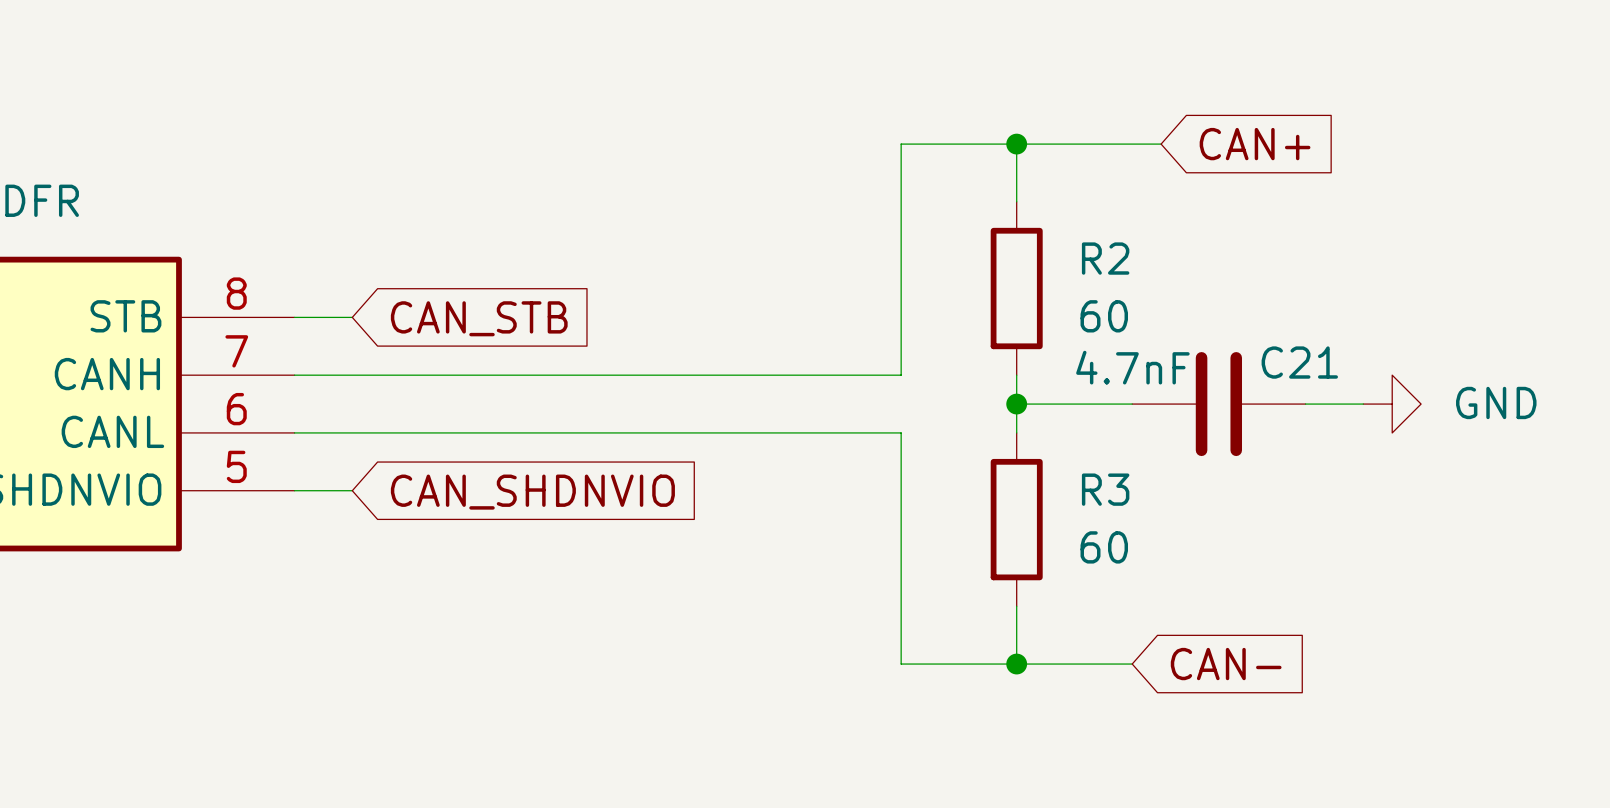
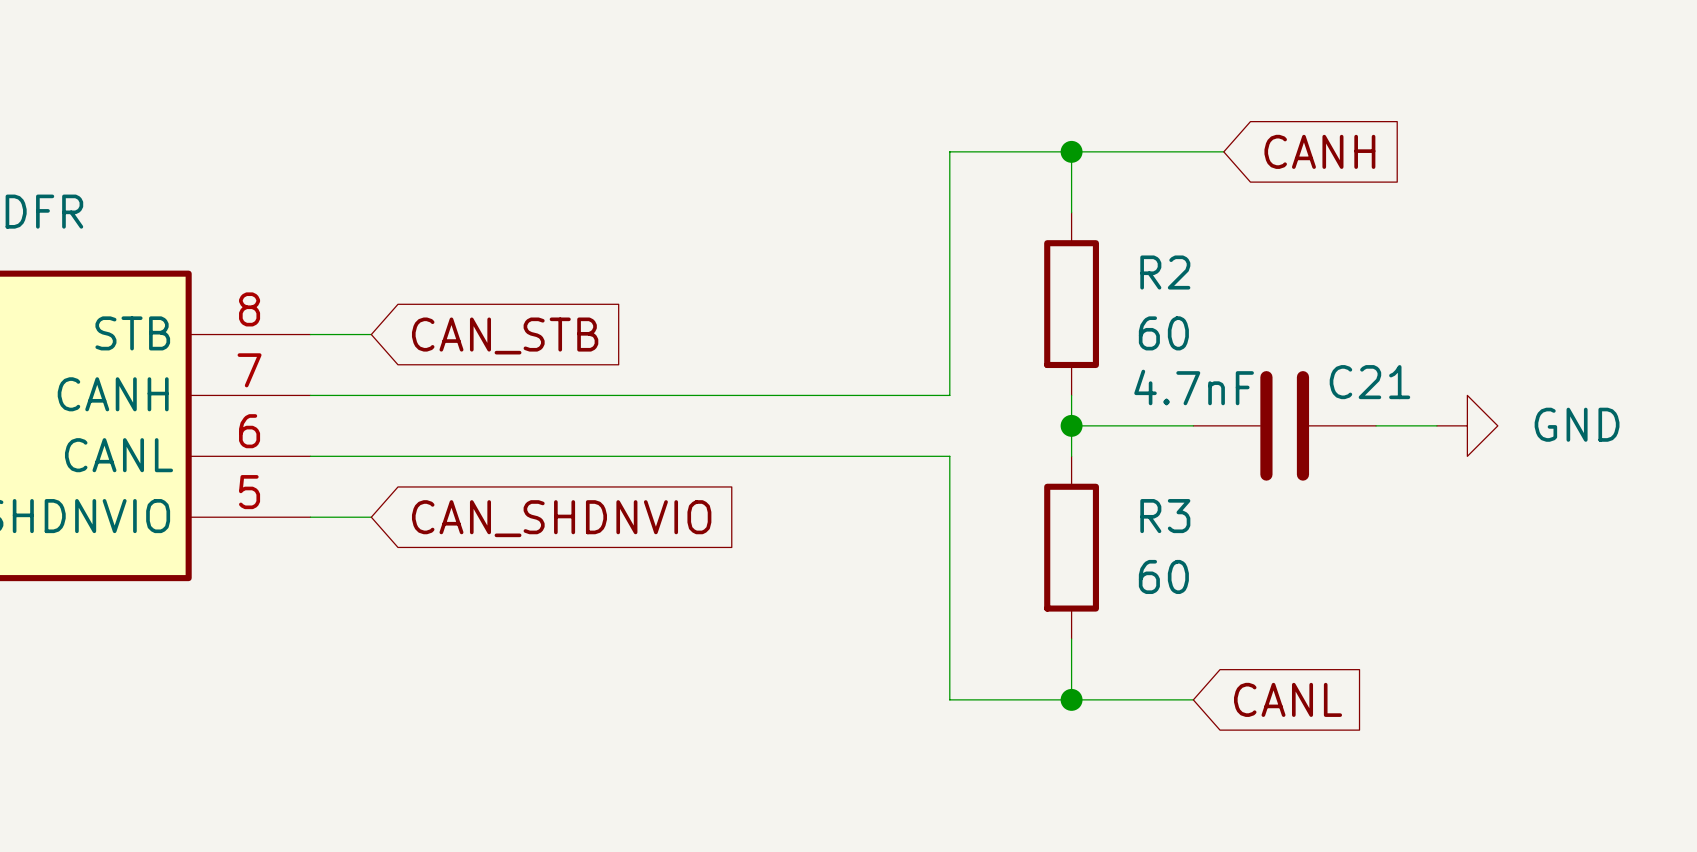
global label: CAN+ (1255, 144) -> CANH (1319, 151)
global label: CAN- (1226, 664) -> CANL (1288, 699)

